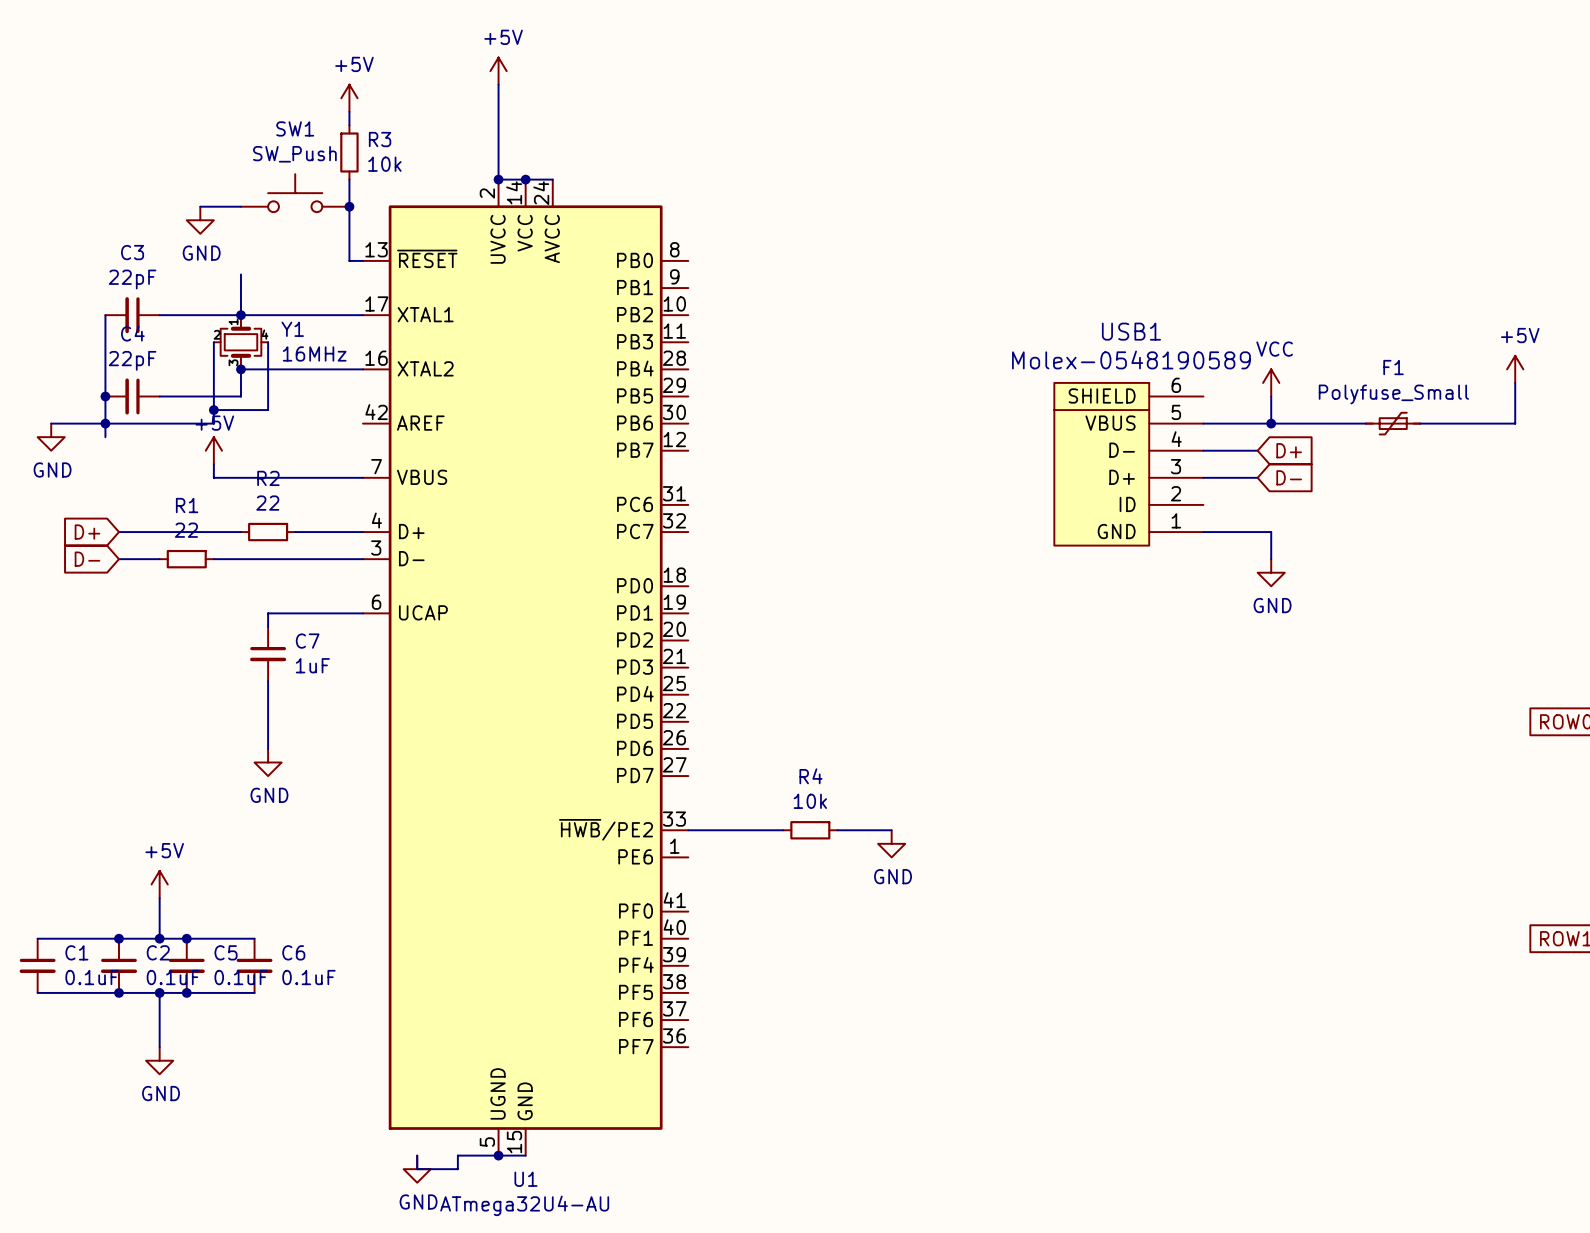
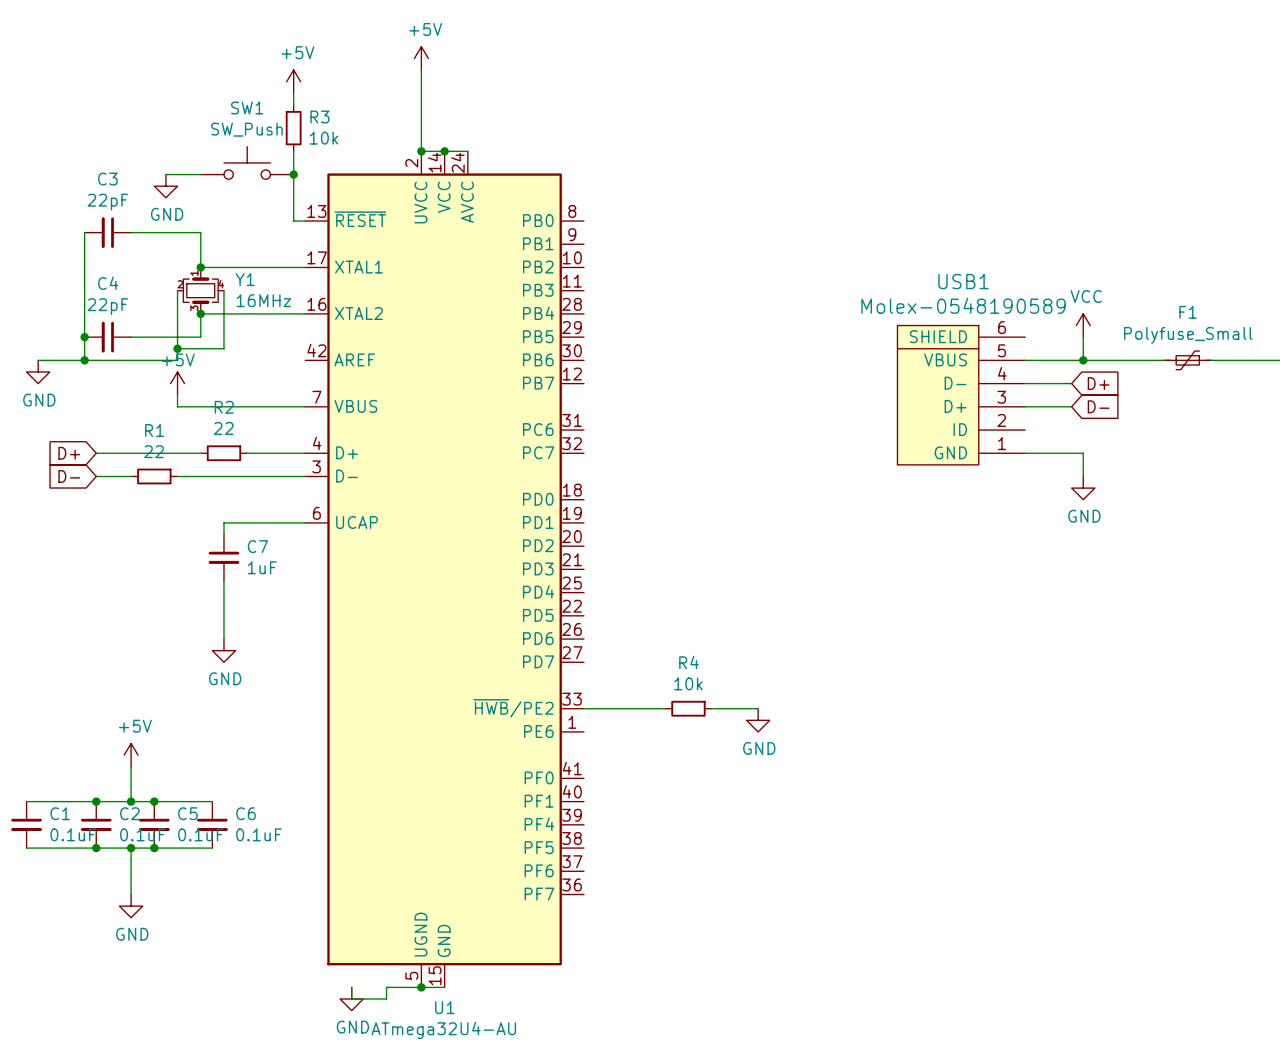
wire: none -> (84, 232) (84, 267)
C3 position: (132, 315) -> (107, 232)
wire: (159, 315) (240, 315) -> (131, 232) (200, 232)
wire: (105, 423) (105, 437) -> none

